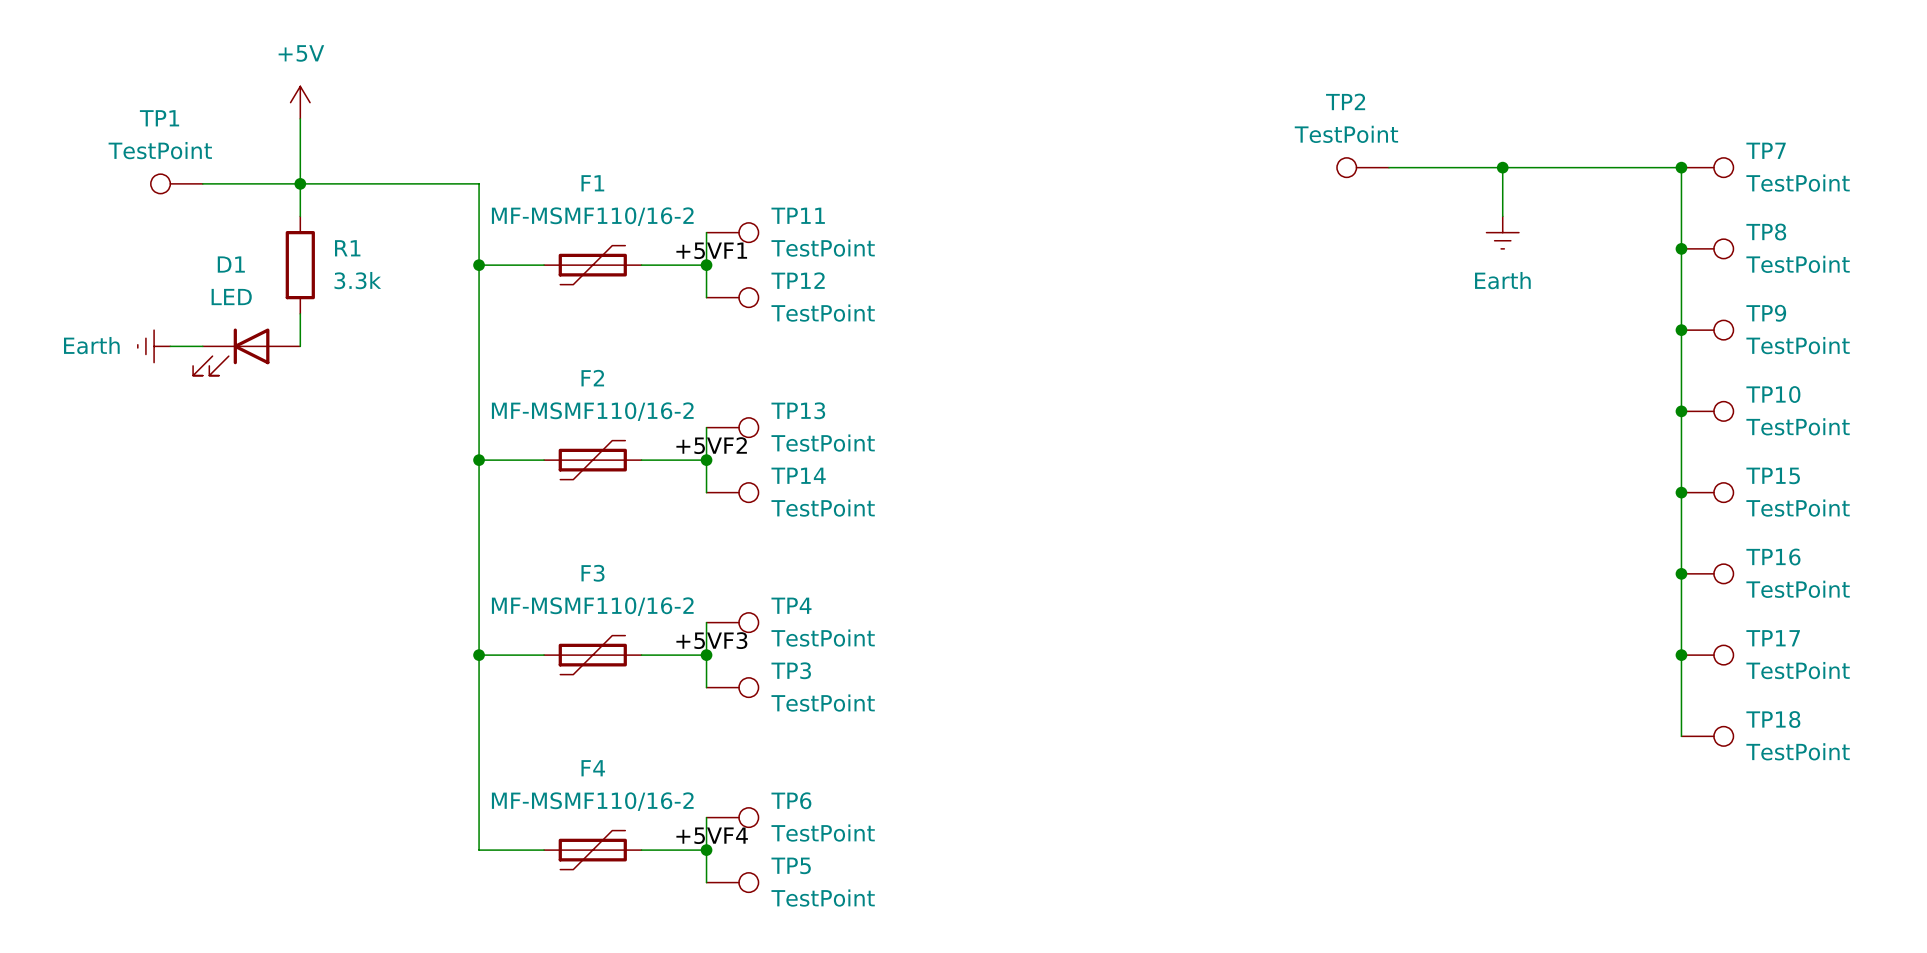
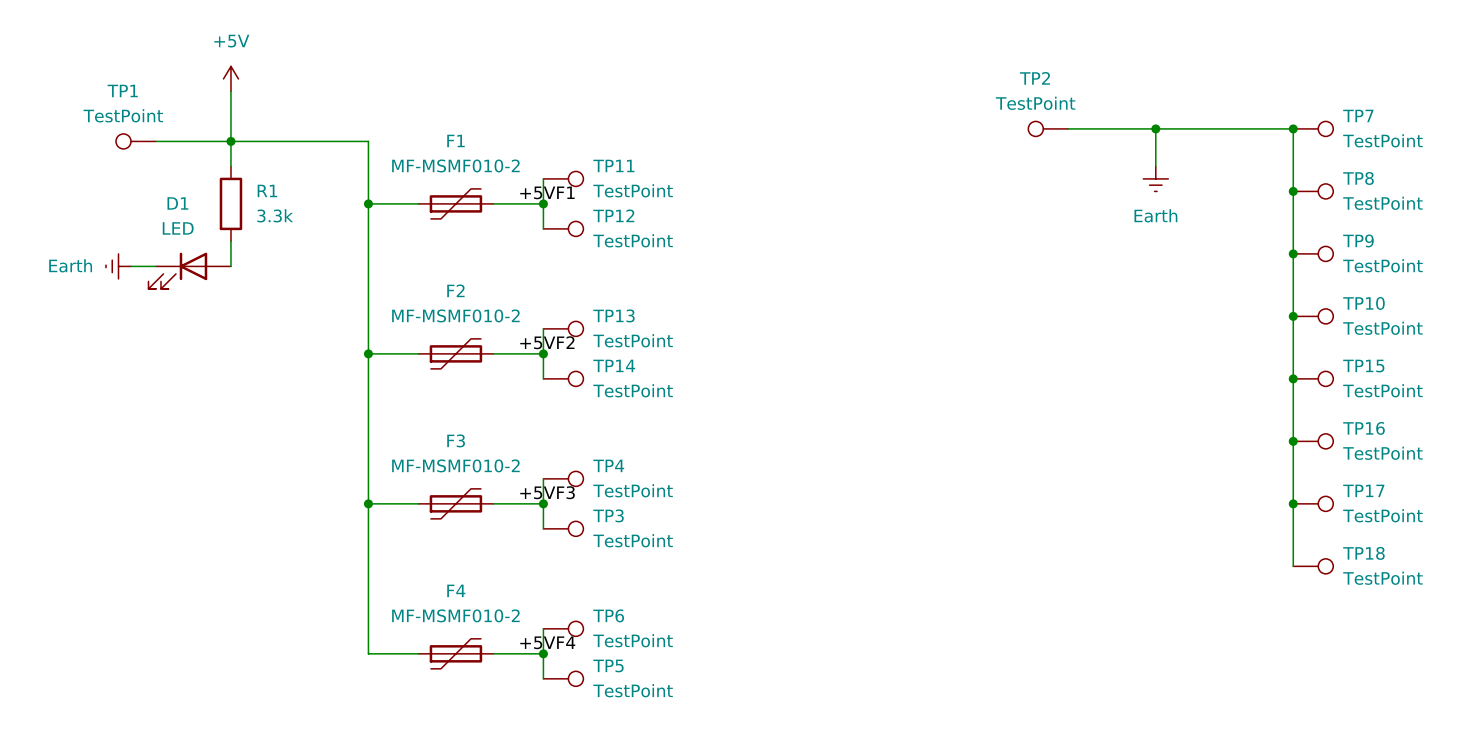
F1 value: MF-MSMF110/16-2 (592, 216) -> MF-MSMF010-2 (455, 165)
F2 value: MF-MSMF110/16-2 (592, 411) -> MF-MSMF010-2 (455, 315)
F3 value: MF-MSMF110/16-2 (592, 606) -> MF-MSMF010-2 (455, 465)
F4 value: MF-MSMF110/16-2 (592, 801) -> MF-MSMF010-2 (455, 615)

